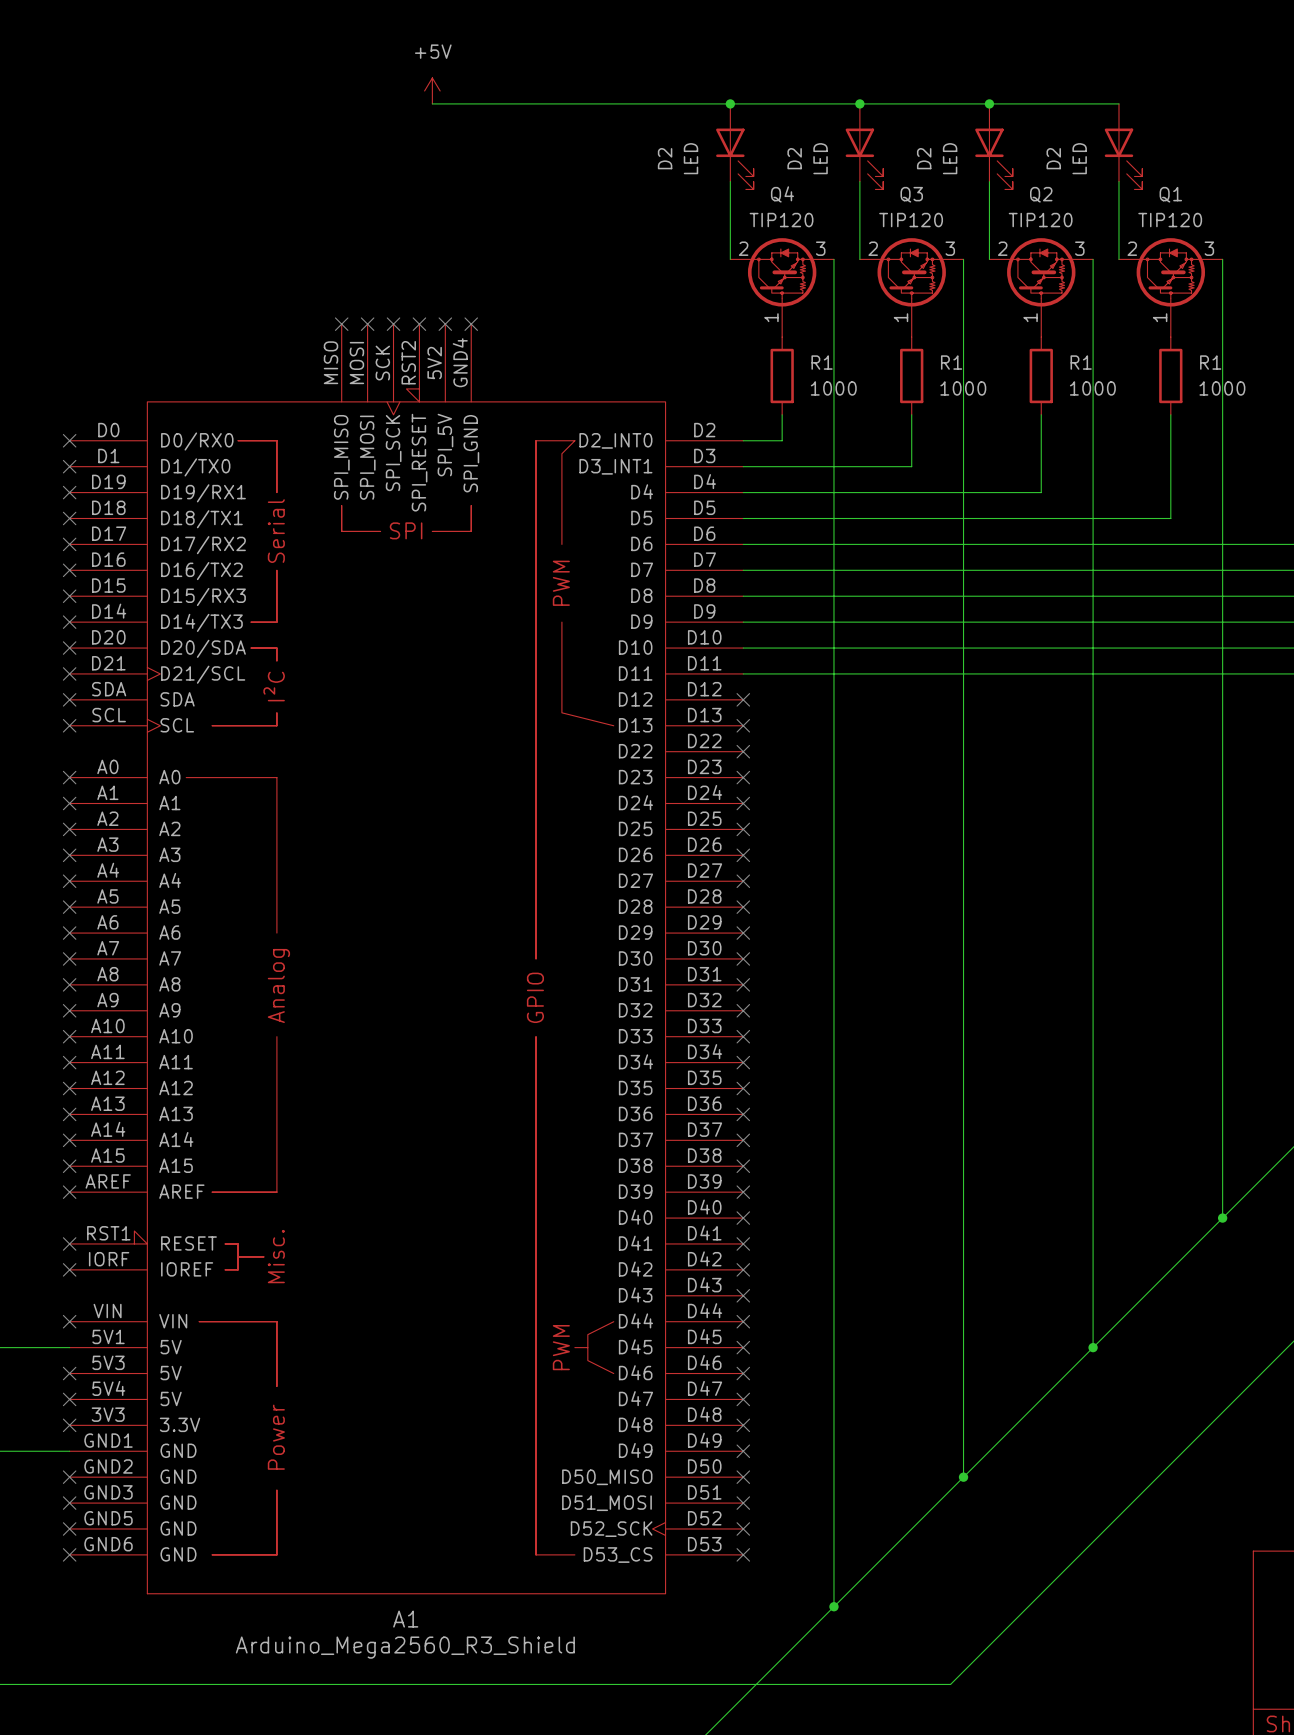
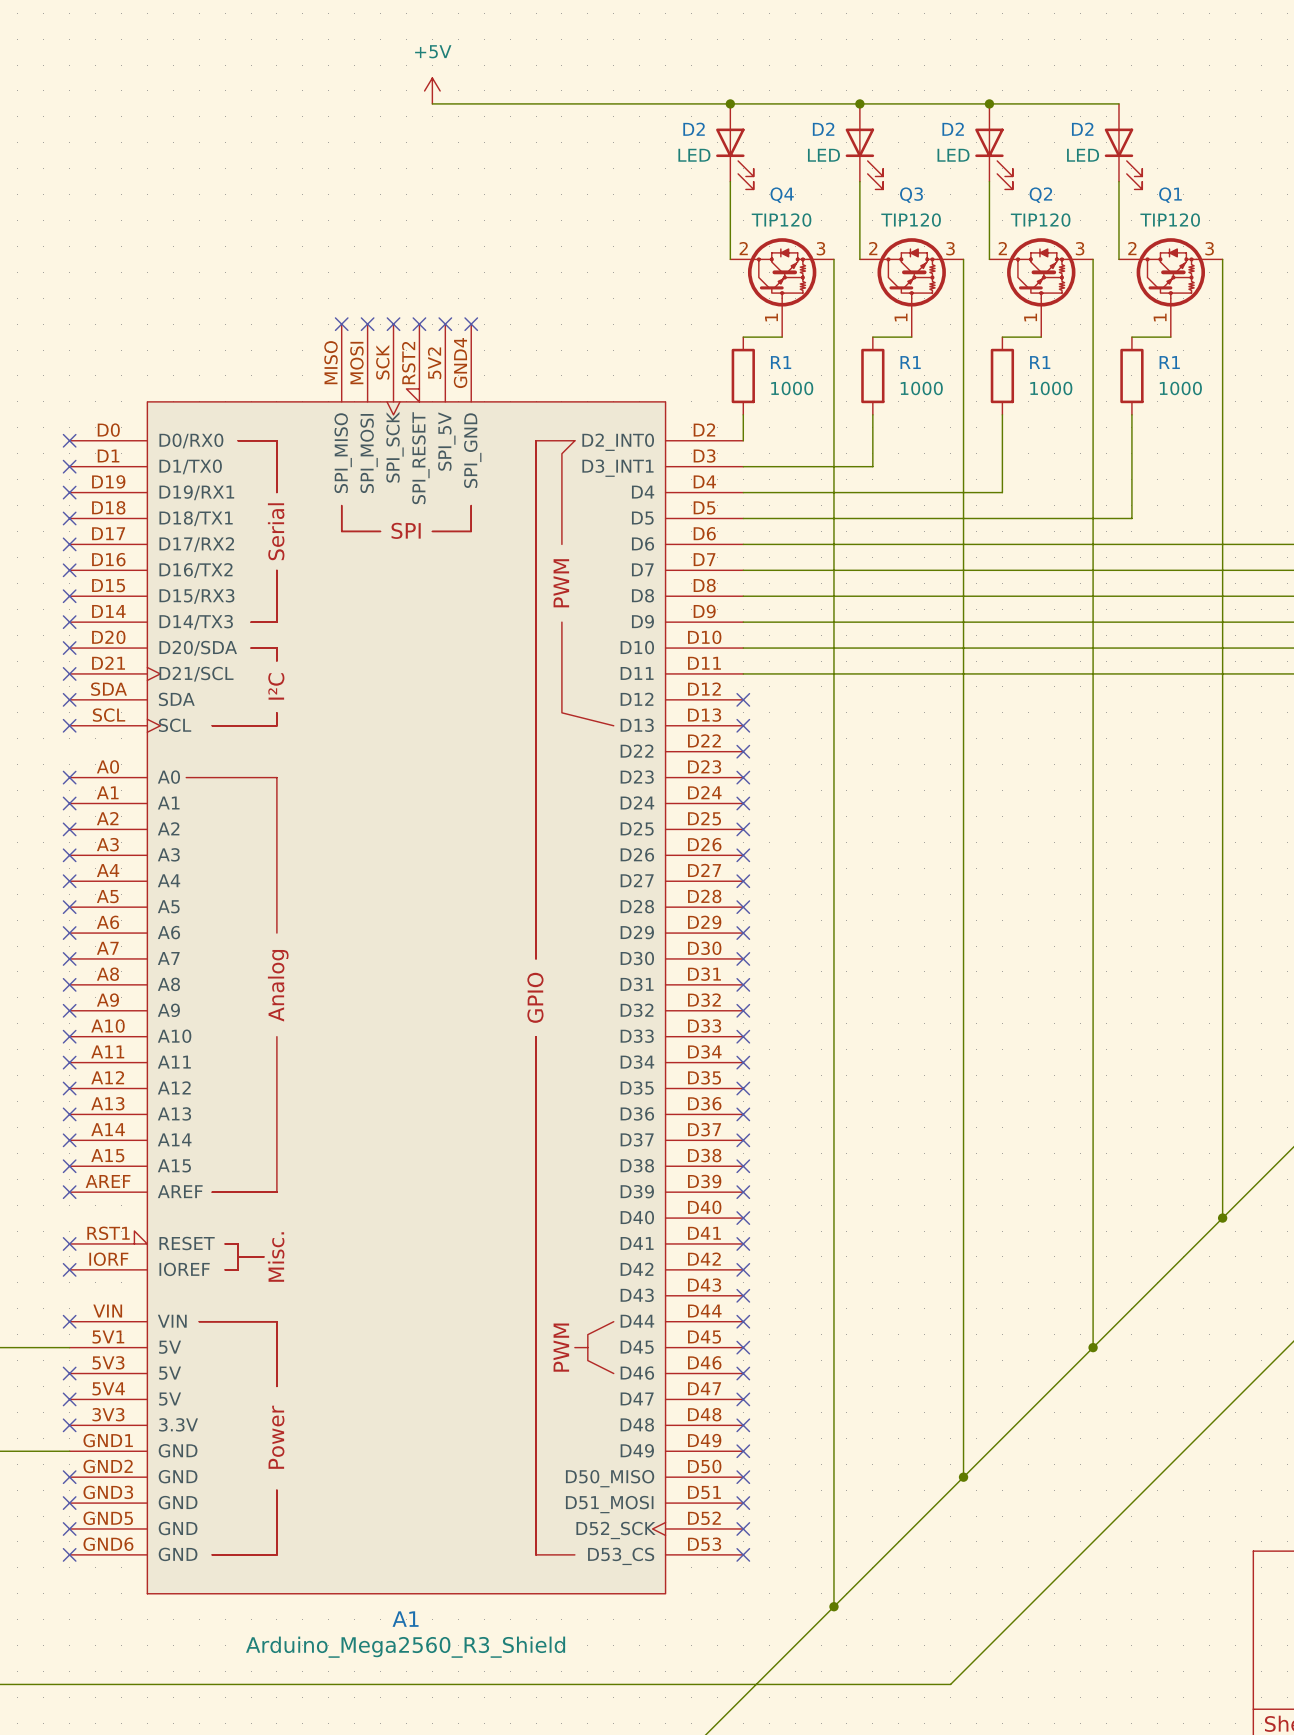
D2 name rotation: 0° (665, 158) -> 90° clockwise (694, 129)
D2 name position: D2 (665, 158) -> D2 (694, 129)
D2 value rotation: 0° (690, 158) -> 90° clockwise (694, 155)
D2 name rotation: 0° (794, 158) -> 90° clockwise (823, 129)
D2 name position: D2 (794, 158) -> D2 (823, 129)
D2 value rotation: 0° (820, 158) -> 90° clockwise (823, 155)
D2 name rotation: 0° (924, 158) -> 90° clockwise (953, 129)
D2 name position: D2 (924, 158) -> D2 (953, 129)
D2 value rotation: 0° (950, 158) -> 90° clockwise (953, 155)
D2 name rotation: 0° (1053, 158) -> 90° clockwise (1082, 129)
D2 name position: D2 (1053, 158) -> D2 (1082, 129)
D2 value rotation: 0° (1079, 158) -> 90° clockwise (1083, 155)
wire: none -> (743, 337) (782, 337)
wire: none -> (872, 337) (911, 337)
wire: none -> (1002, 337) (1041, 337)
wire: none -> (1131, 337) (1170, 337)
R1 position: (782, 375) -> (743, 375)
R1 position: (911, 375) -> (872, 375)
R1 position: (1041, 375) -> (1002, 375)
R1 position: (1170, 375) -> (1131, 375)
wire: (782, 414) (782, 440) (743, 440) -> (743, 414) (743, 440)
wire: (911, 414) (911, 466) (872, 466) -> (872, 414) (872, 466)
wire: (1041, 414) (1041, 492) (1002, 492) -> (1002, 414) (1002, 492)
wire: (1170, 414) (1170, 518) (1131, 518) -> (1131, 414) (1131, 518)

